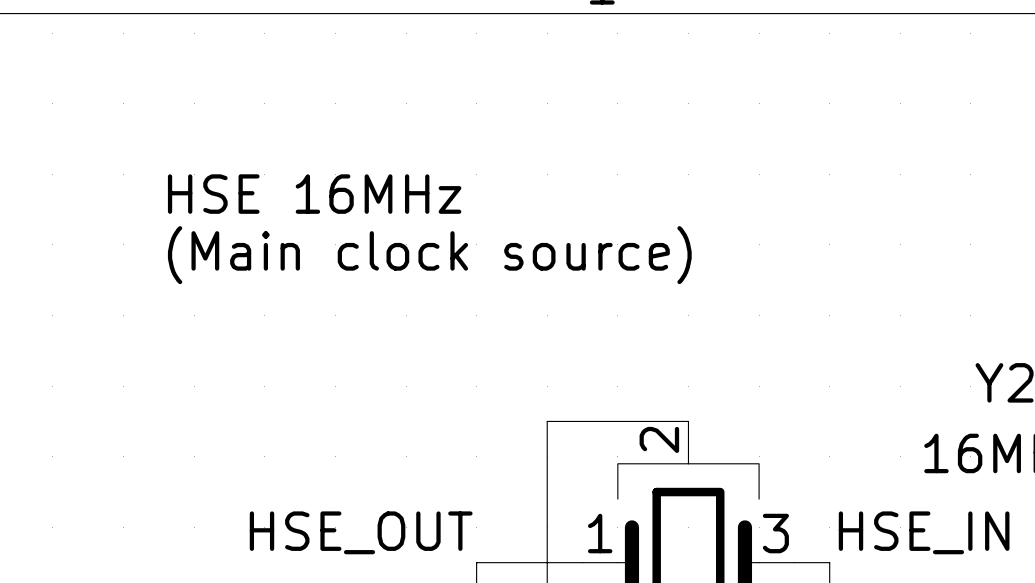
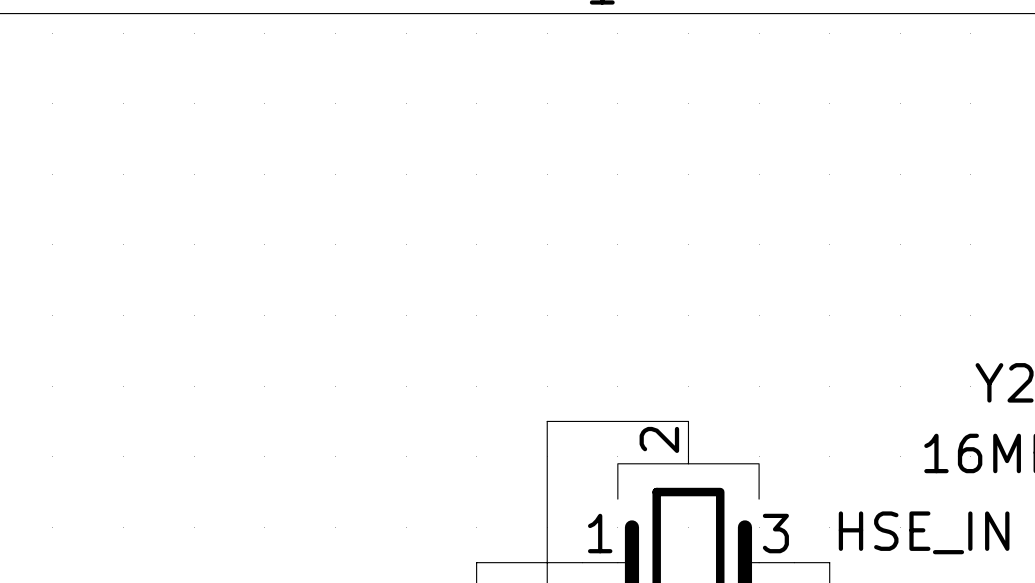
text: HSE 16MHz (314, 194) -> none
text: (Main clock source) (429, 255) -> none
label: HSE_OUT (361, 532) -> none

